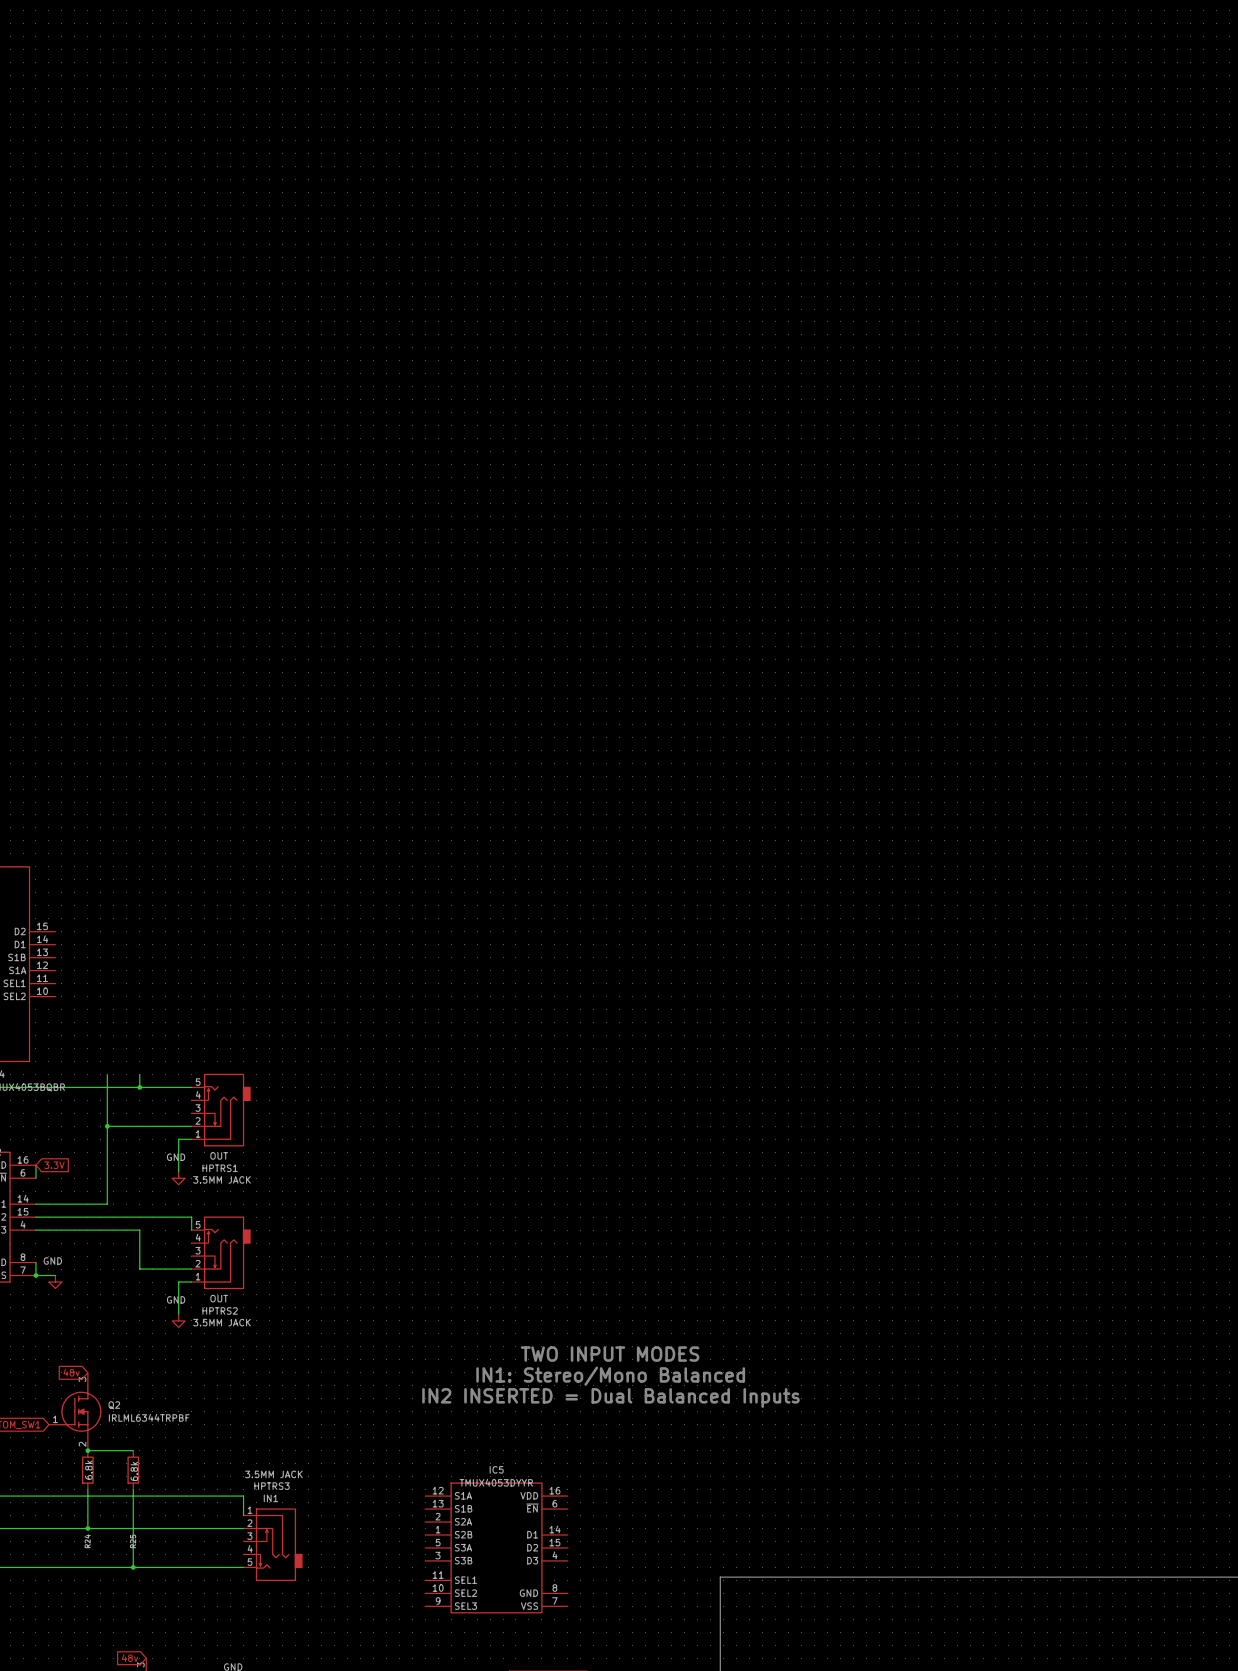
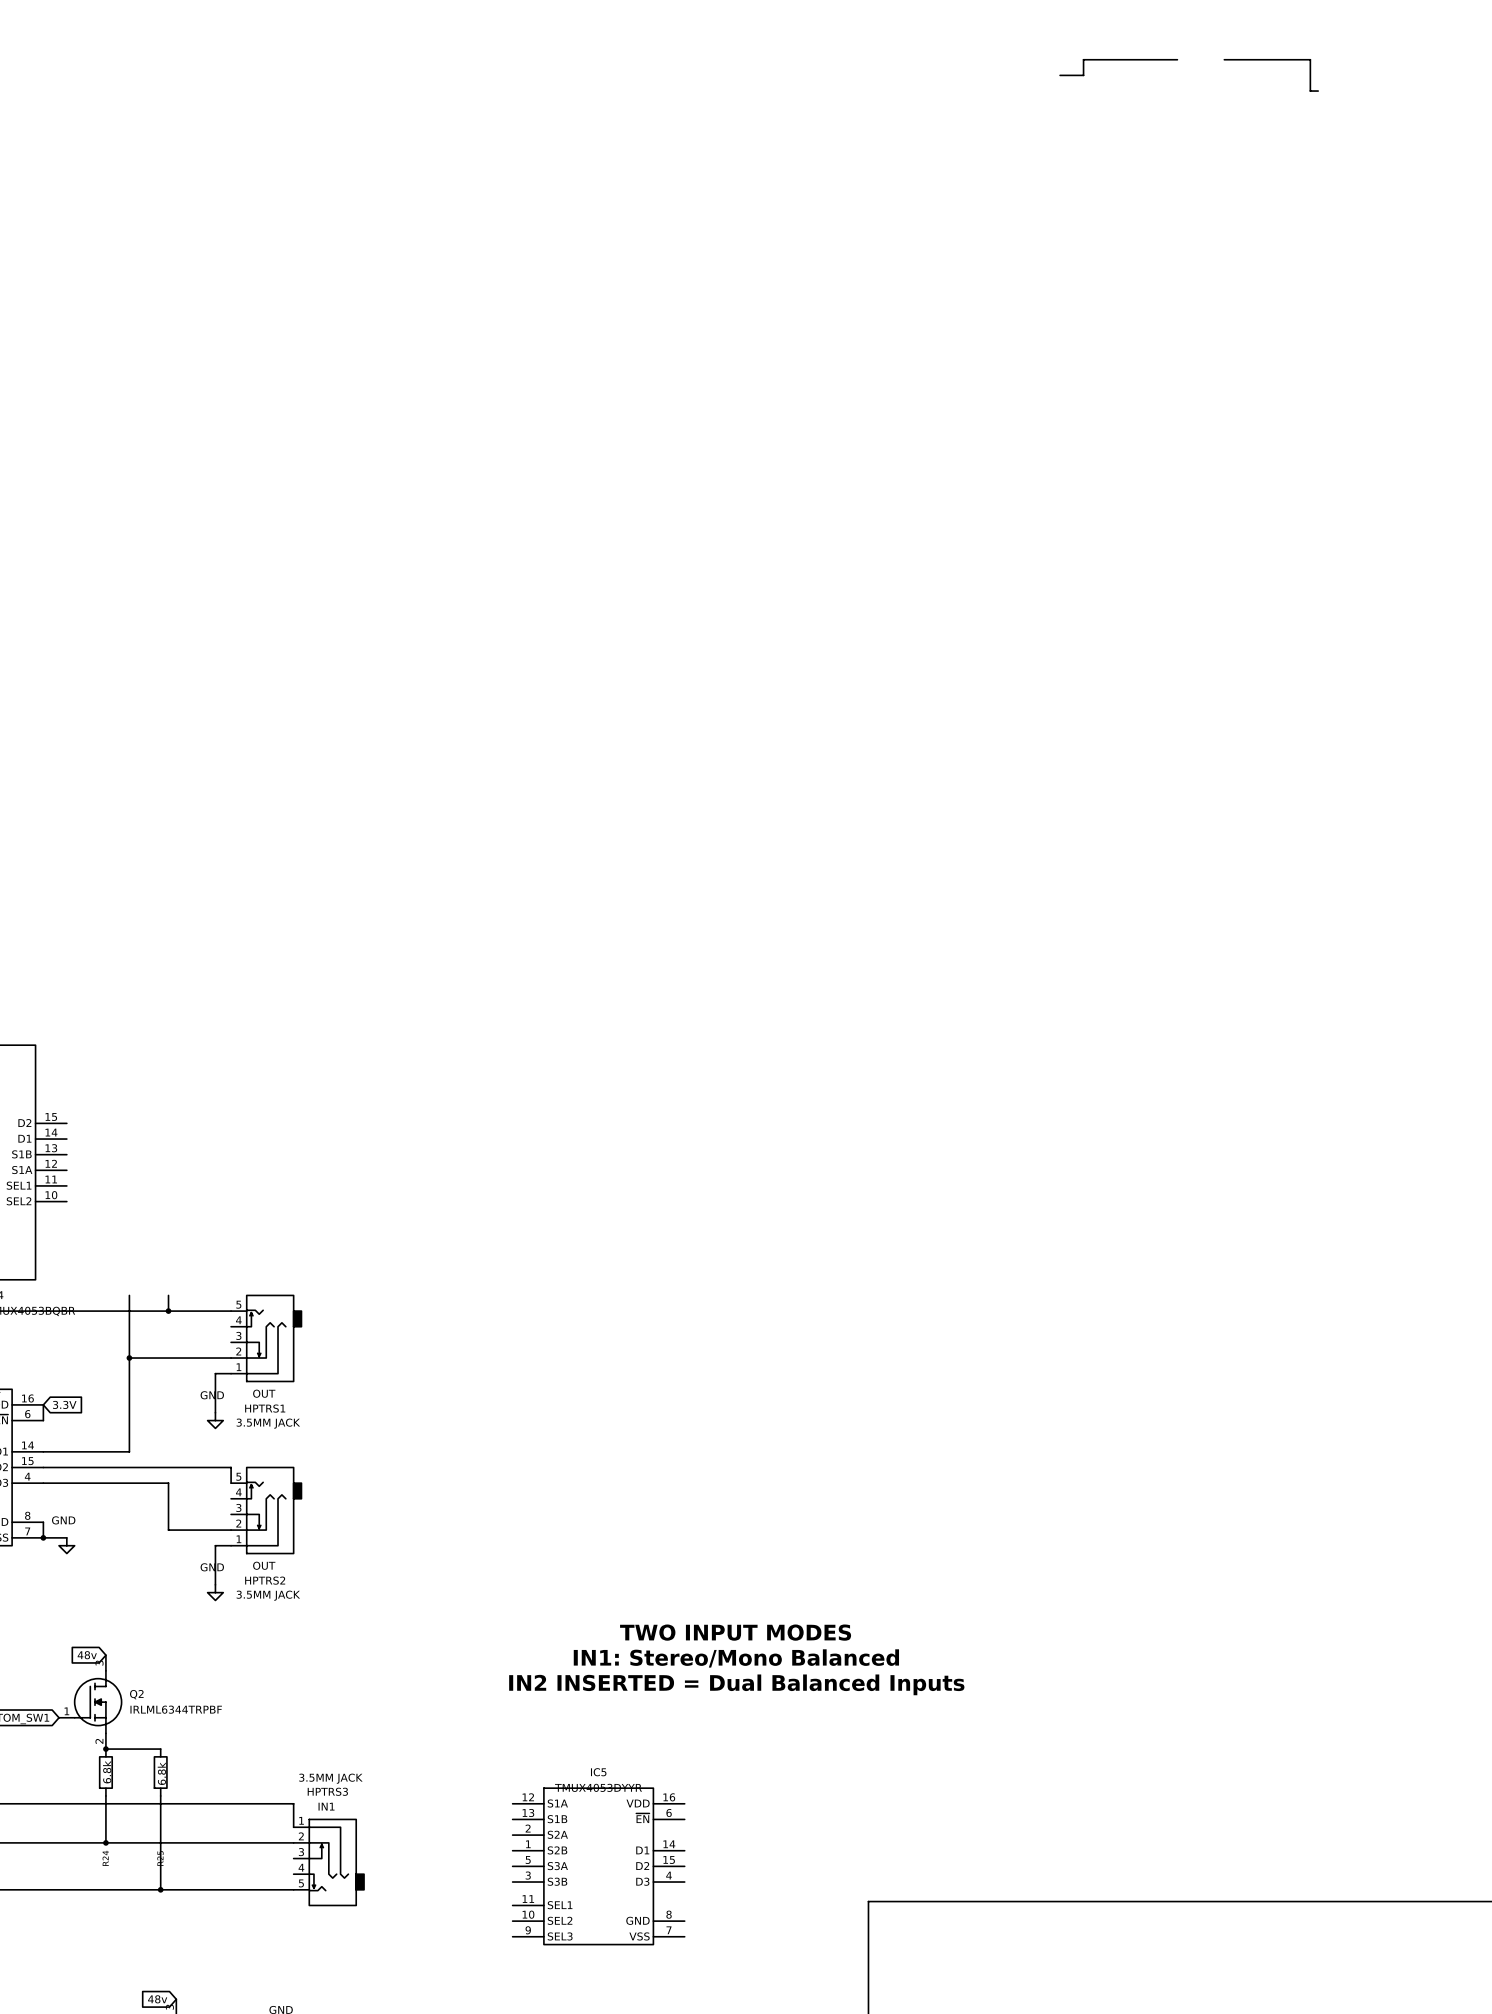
wire: none -> (1177, 59) (1083, 59) (1083, 75) (1060, 75)
wire: none -> (1224, 59) (1310, 59) (1310, 91) (1318, 91)

